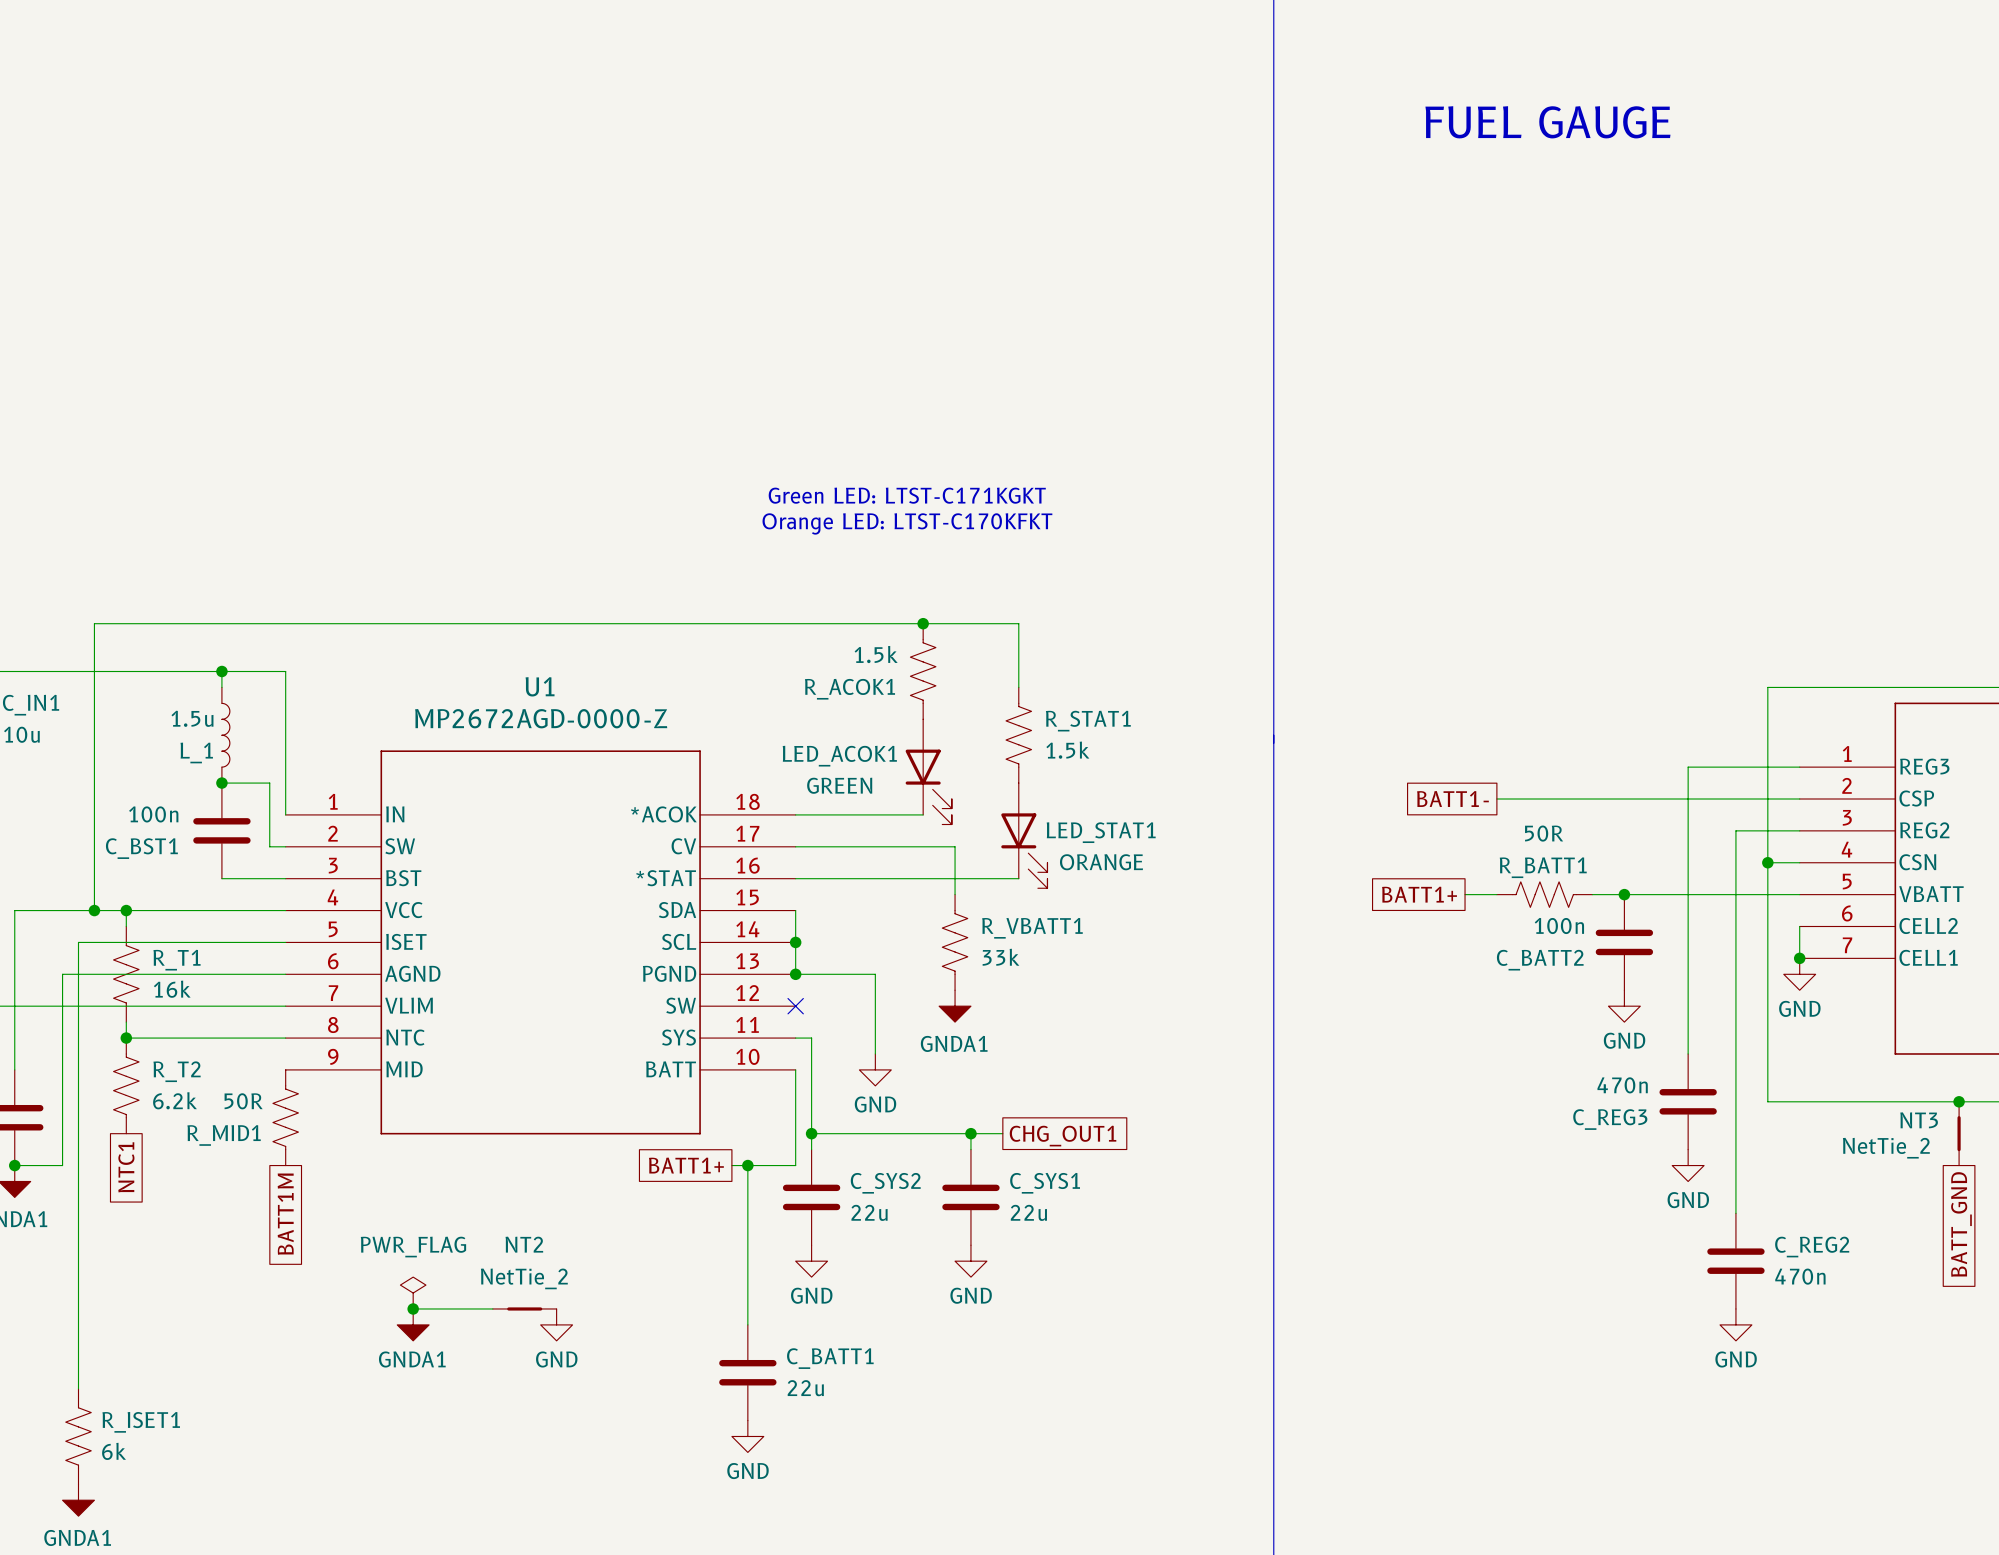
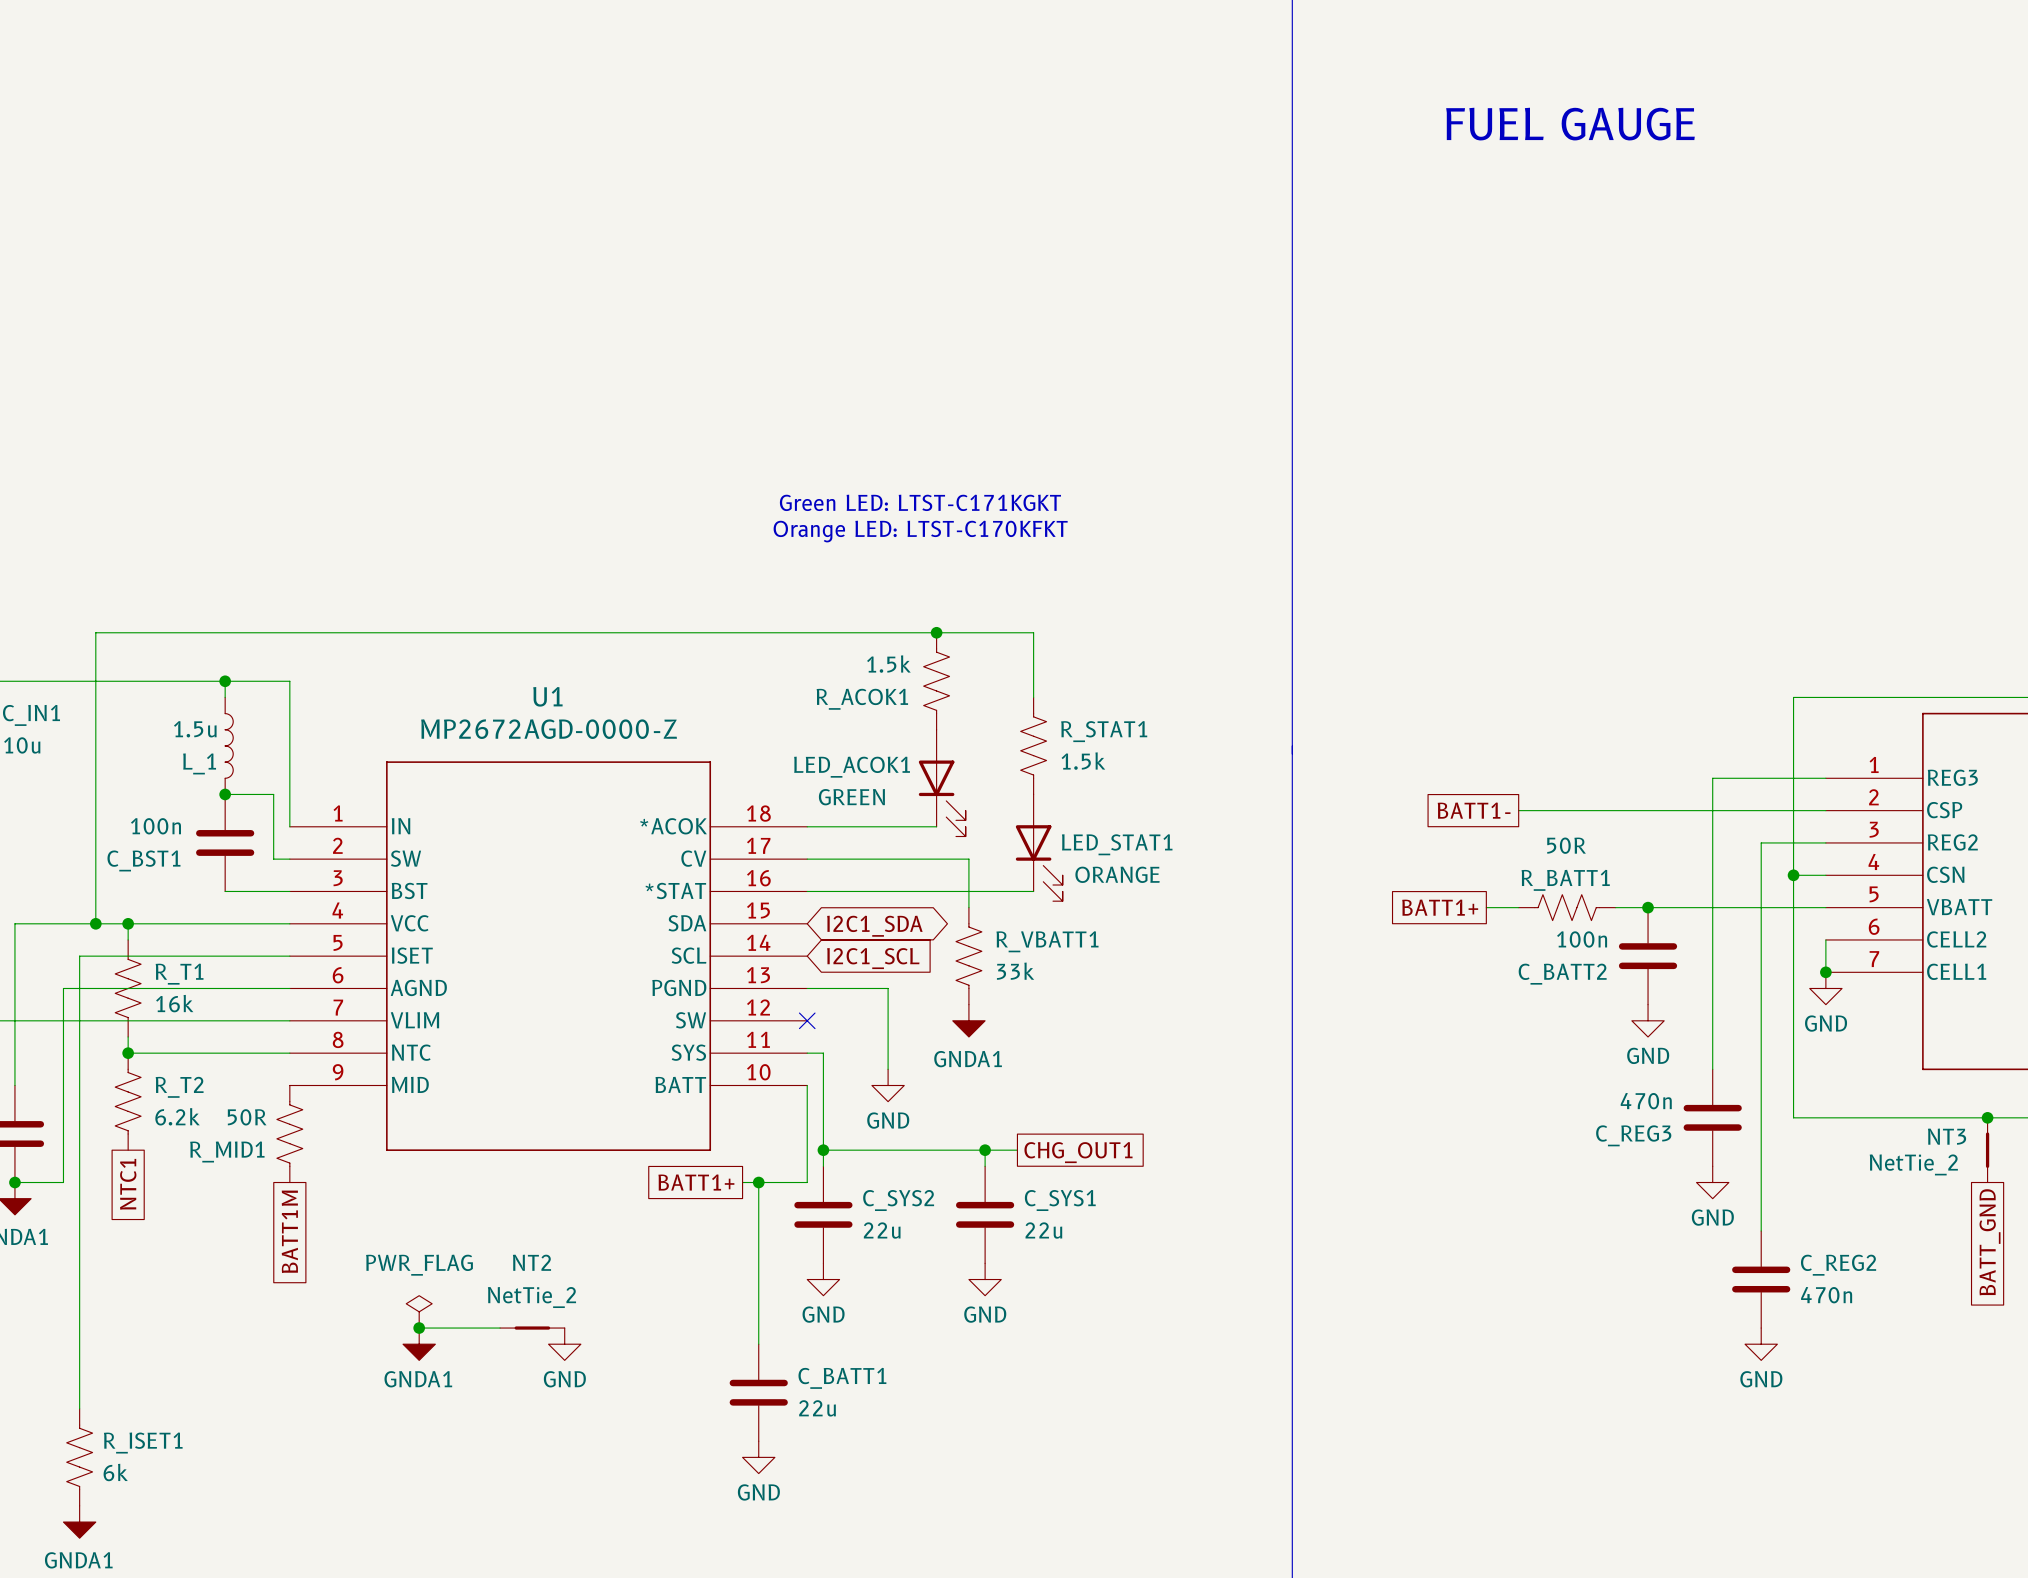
wire: (795, 910) (795, 974) -> none
global label: none -> I2C1_SDA (874, 926)
junction: (795, 942) -> none
global label: none -> I2C1_SCL (873, 958)
junction: (795, 974) -> none

